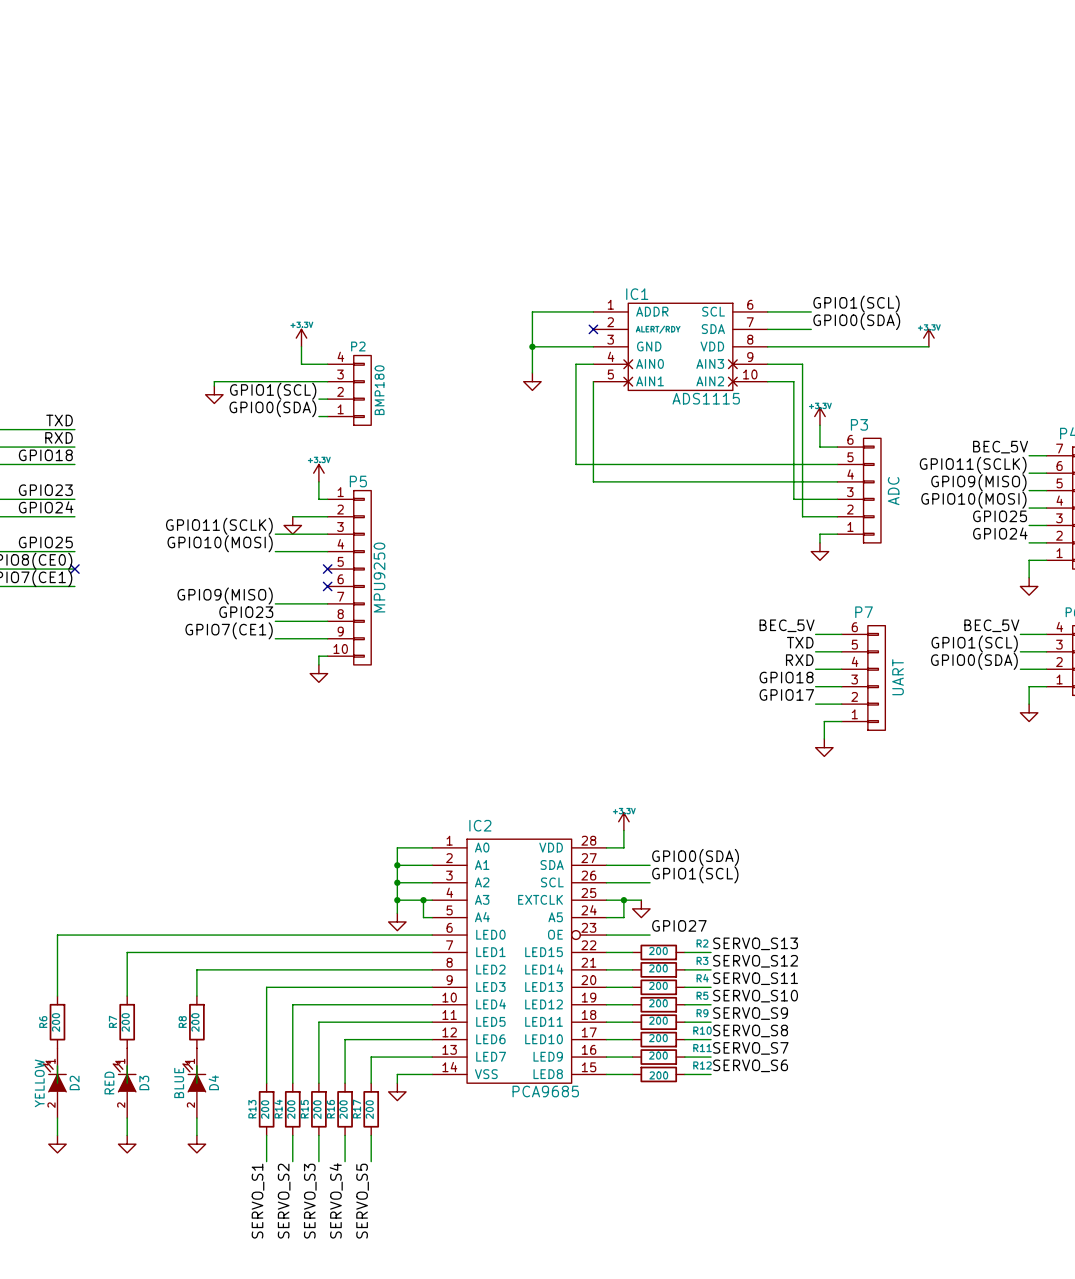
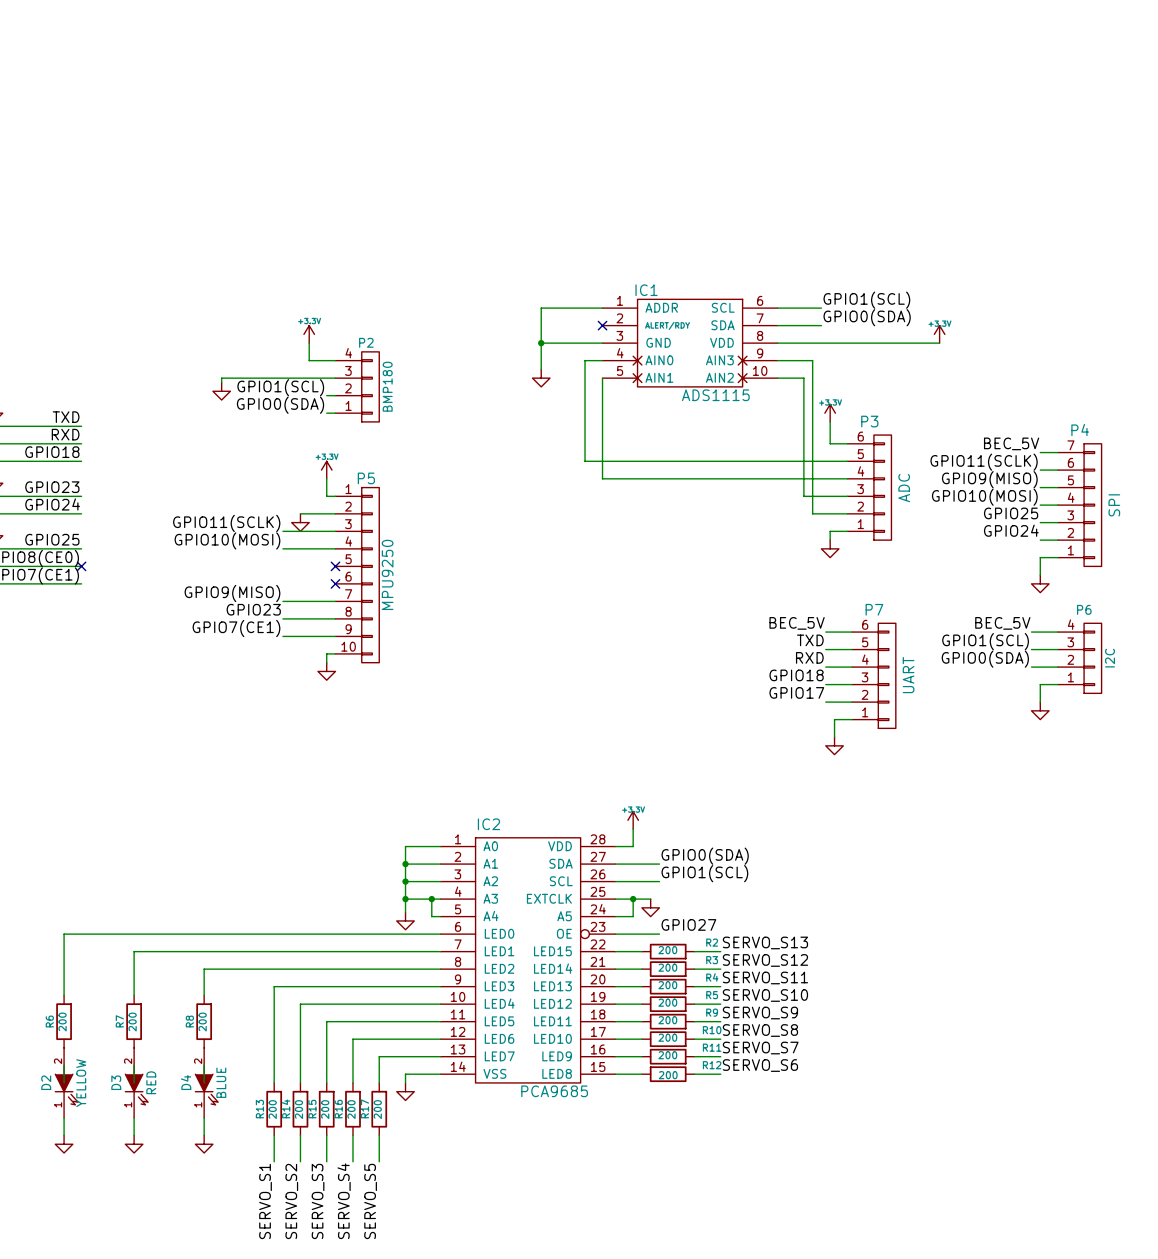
D2 rotation: 0° (54, 1076) -> 180° (66, 1089)
D3 rotation: 0° (124, 1076) -> 180° (136, 1089)
D4 rotation: 0° (194, 1076) -> 180° (206, 1089)

